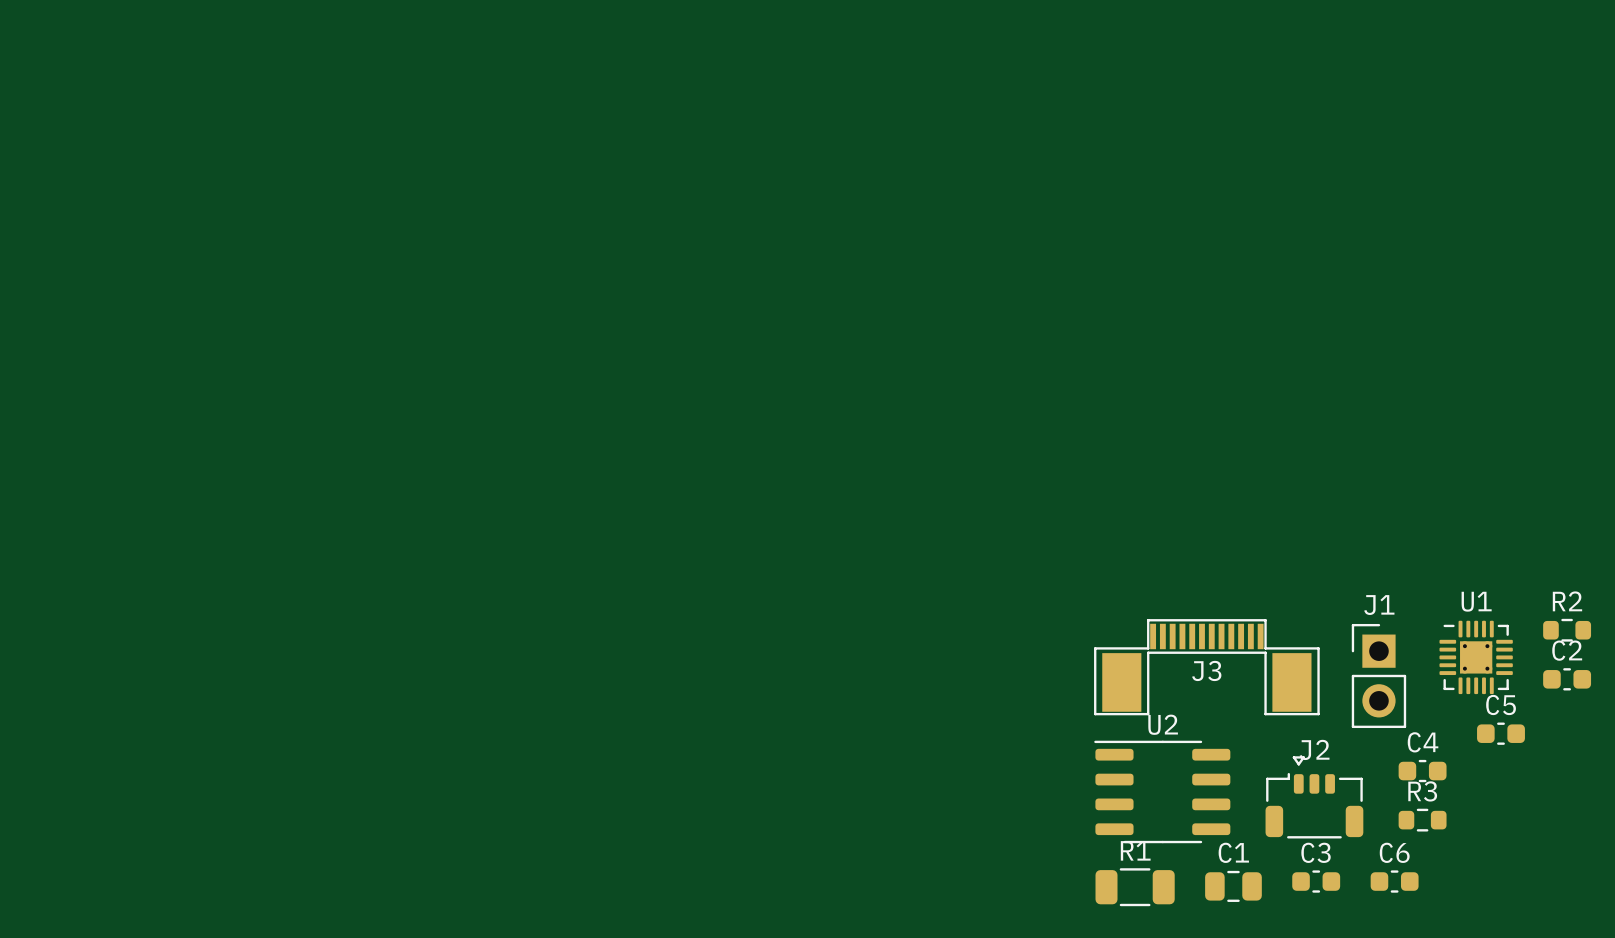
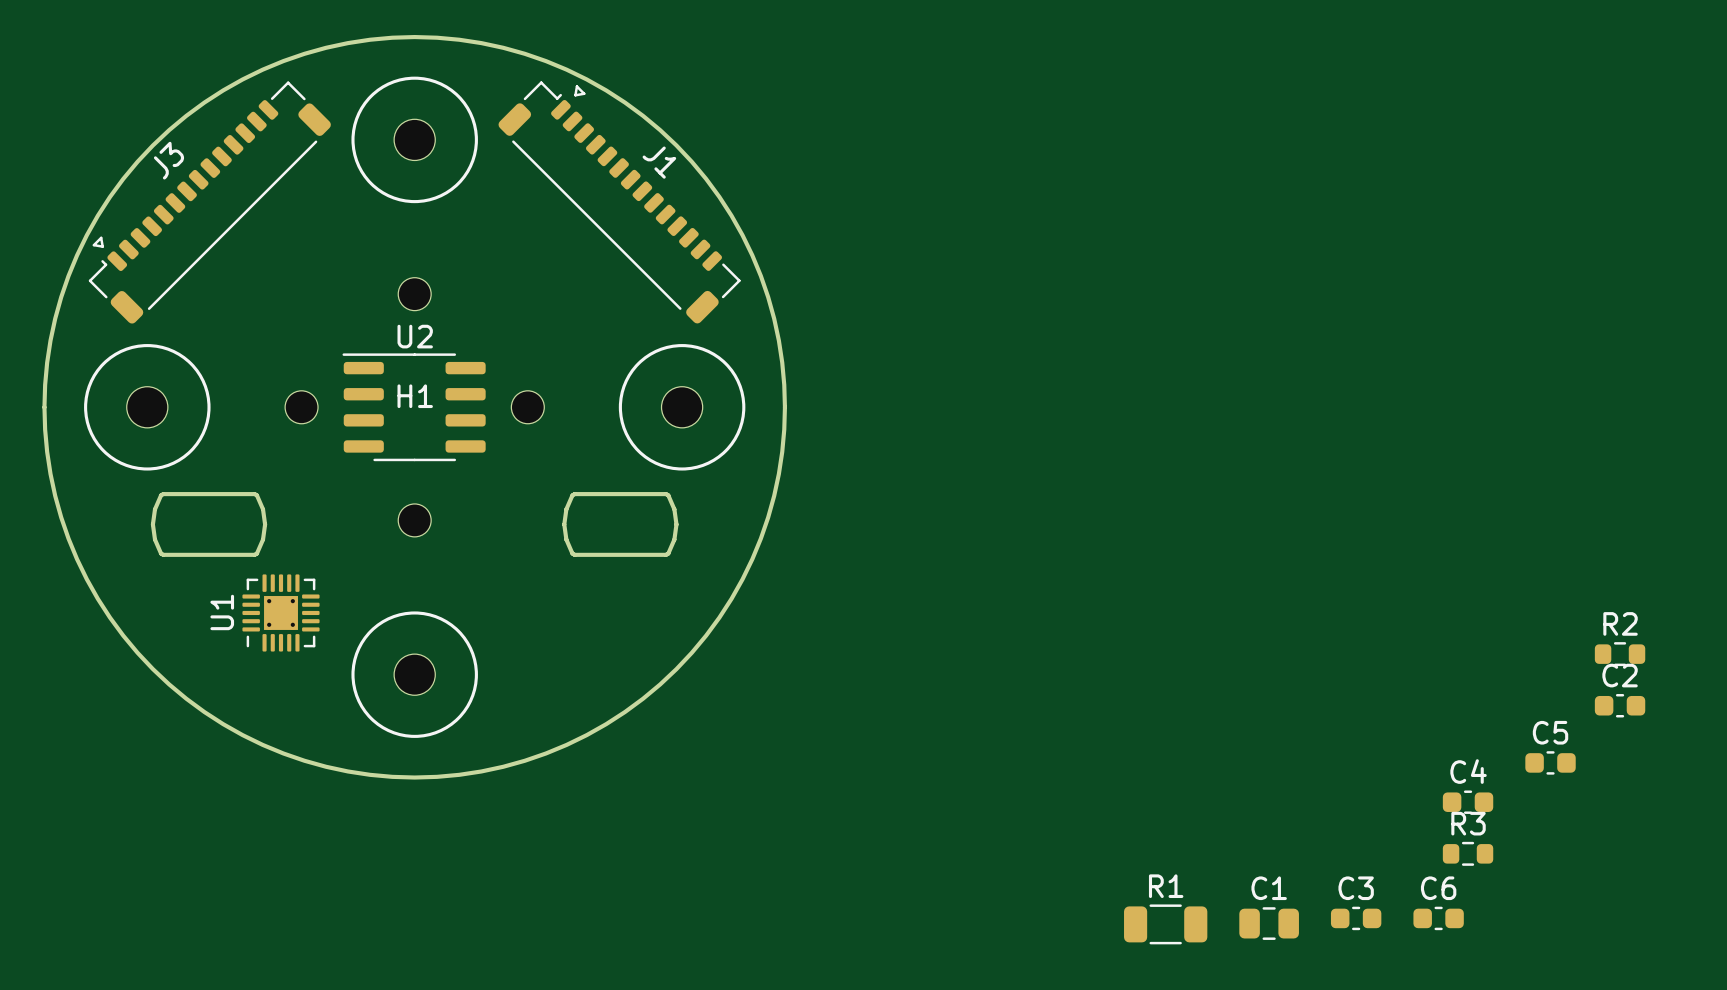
drawing: none -> [351, 76, 478, 204]
drawing: none -> [84, 344, 211, 471]
drawing: none -> [618, 344, 746, 471]
board edge: none -> (44, 407) (50, 474) (68, 538) (97, 598) (123, 635) (152, 669) (186, 698) (223, 724) (283, 753) (347, 771) (414, 777) (481, 771) (545, 753) (606, 724) (643, 698) (676, 669) (706, 635) (731, 598) (760, 538) (778, 474) (784, 407) (778, 340) (760, 275) (731, 215) (706, 178) (676, 145) (643, 115) (606, 90) (545, 61) (481, 43) (414, 37) (347, 43) (283, 61) (223, 90) (186, 115) (152, 145) (123, 178) (97, 215) (68, 275) (50, 340) (44, 407)
H1: none -> (414, 407)
drawing: none -> [351, 611, 478, 738]
J1 name position: J1 (1379, 605) -> J1 (659, 162)
J3 footprint: [1094, 619, 1320, 716] -> [88, 81, 331, 324]
J1 footprint: [1351, 623, 1407, 729] -> [498, 81, 741, 324]
U1 rotation: 0° (1476, 657) -> 90° counterclockwise (281, 612)
U1 position: (1476, 657) -> (281, 612)
J3 name position: J3 (1206, 670) -> J3 (168, 160)
U2 position: (1162, 791) -> (414, 407)
J2: (1314, 797) -> none

